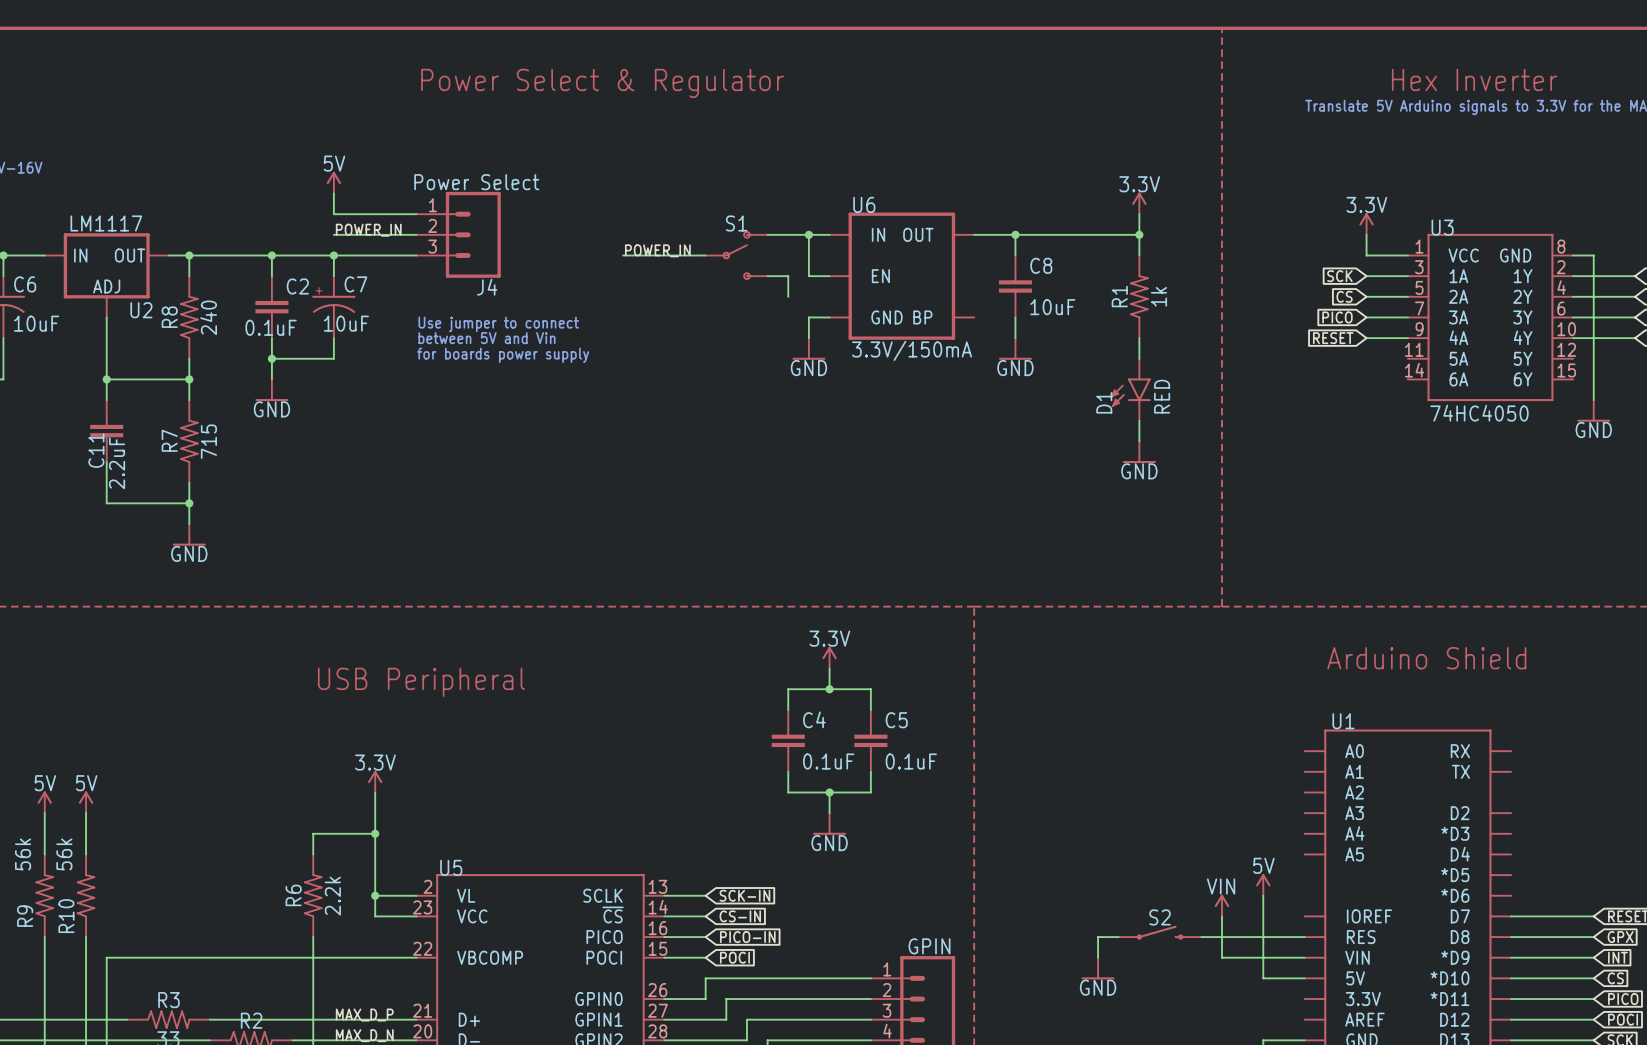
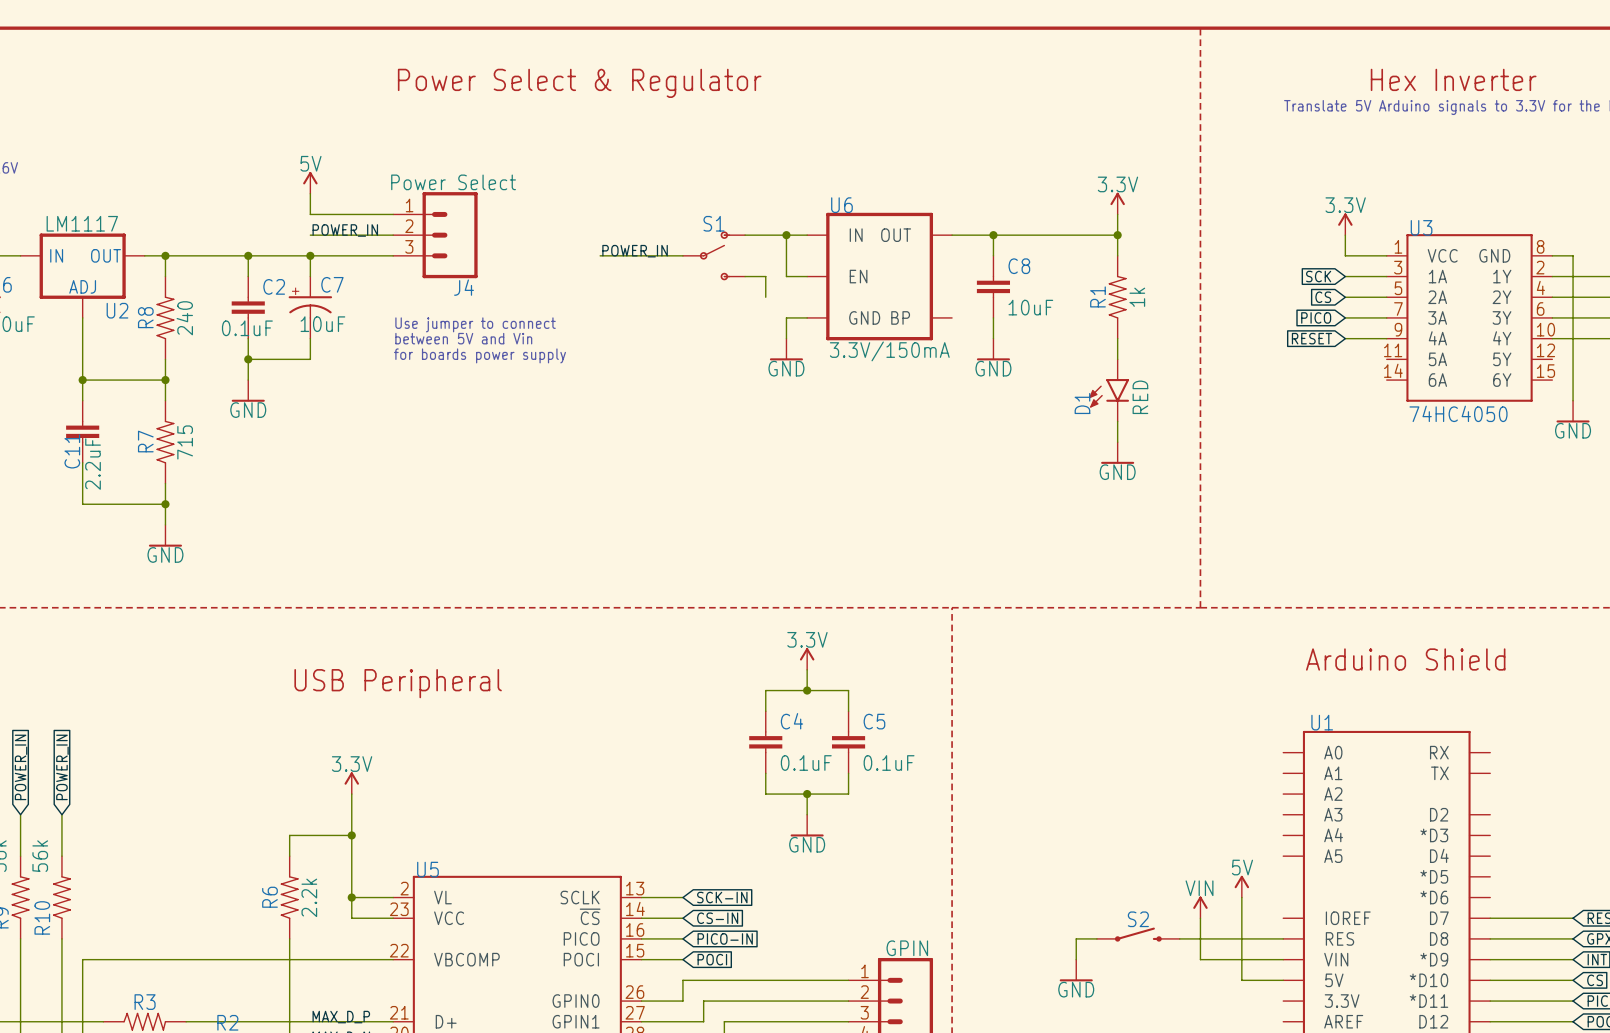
global label: none -> POWER_IN (21, 767)
global label: none -> POWER_IN (62, 767)
power symbol: 5V (44, 802) -> none
power symbol: 5V (86, 802) -> none

